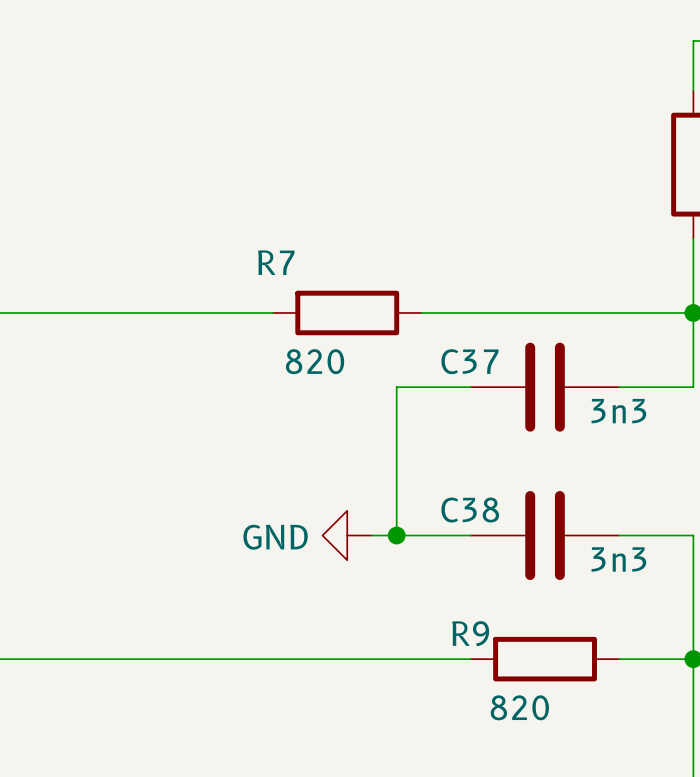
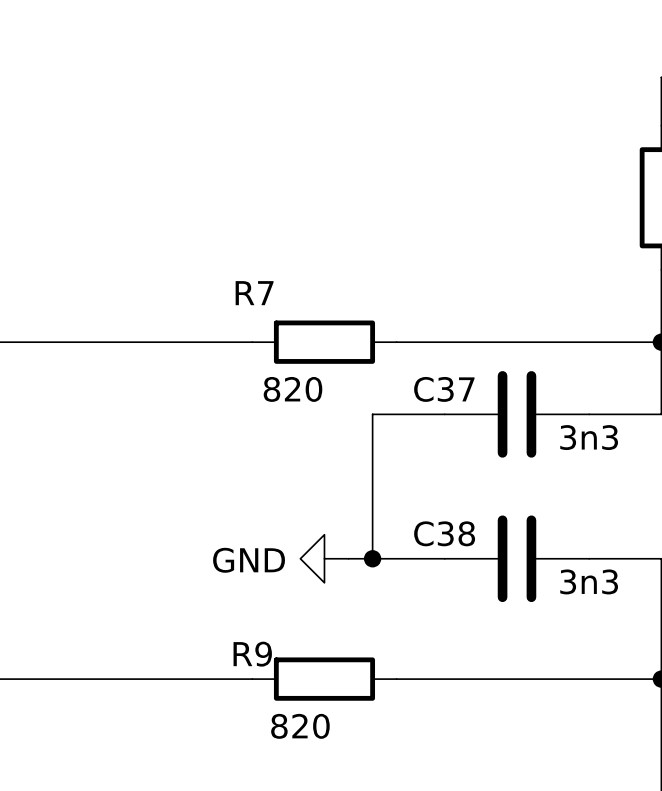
wire: (273, 659) (421, 659) -> (444, 679) (589, 679)
R9 position: (545, 659) -> (324, 679)

